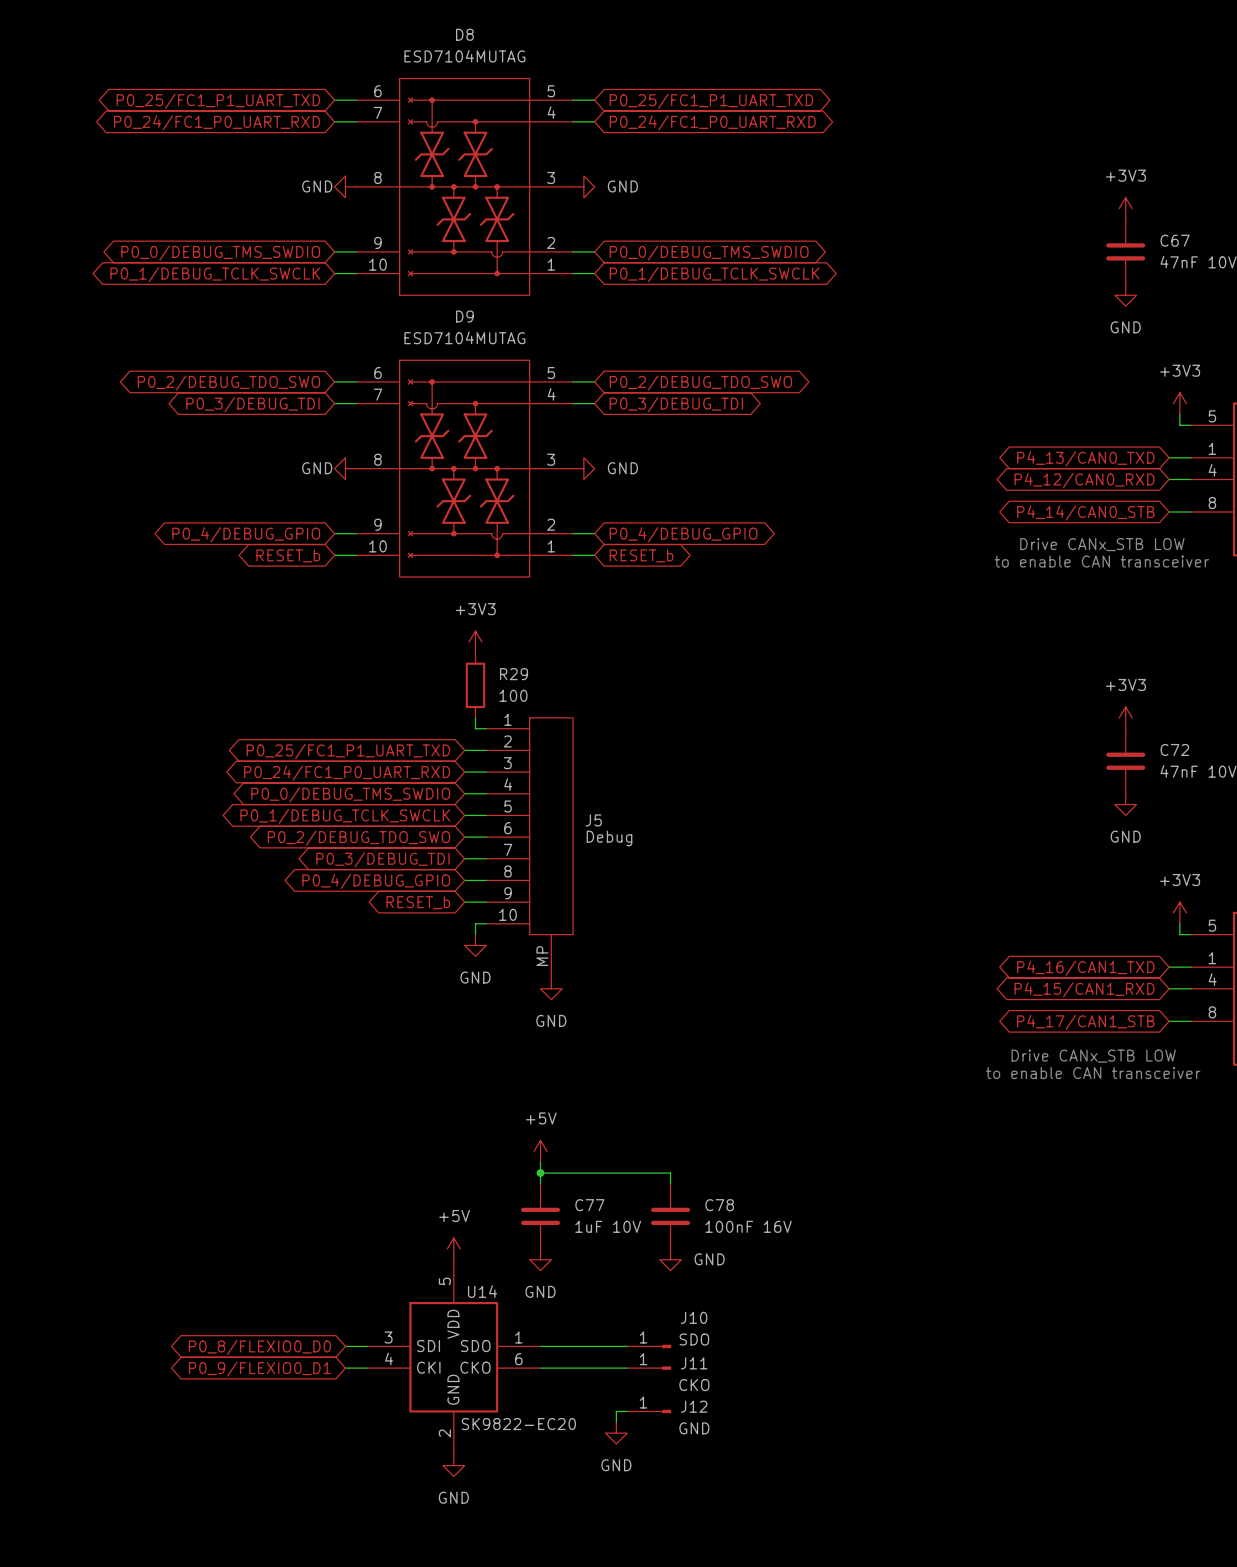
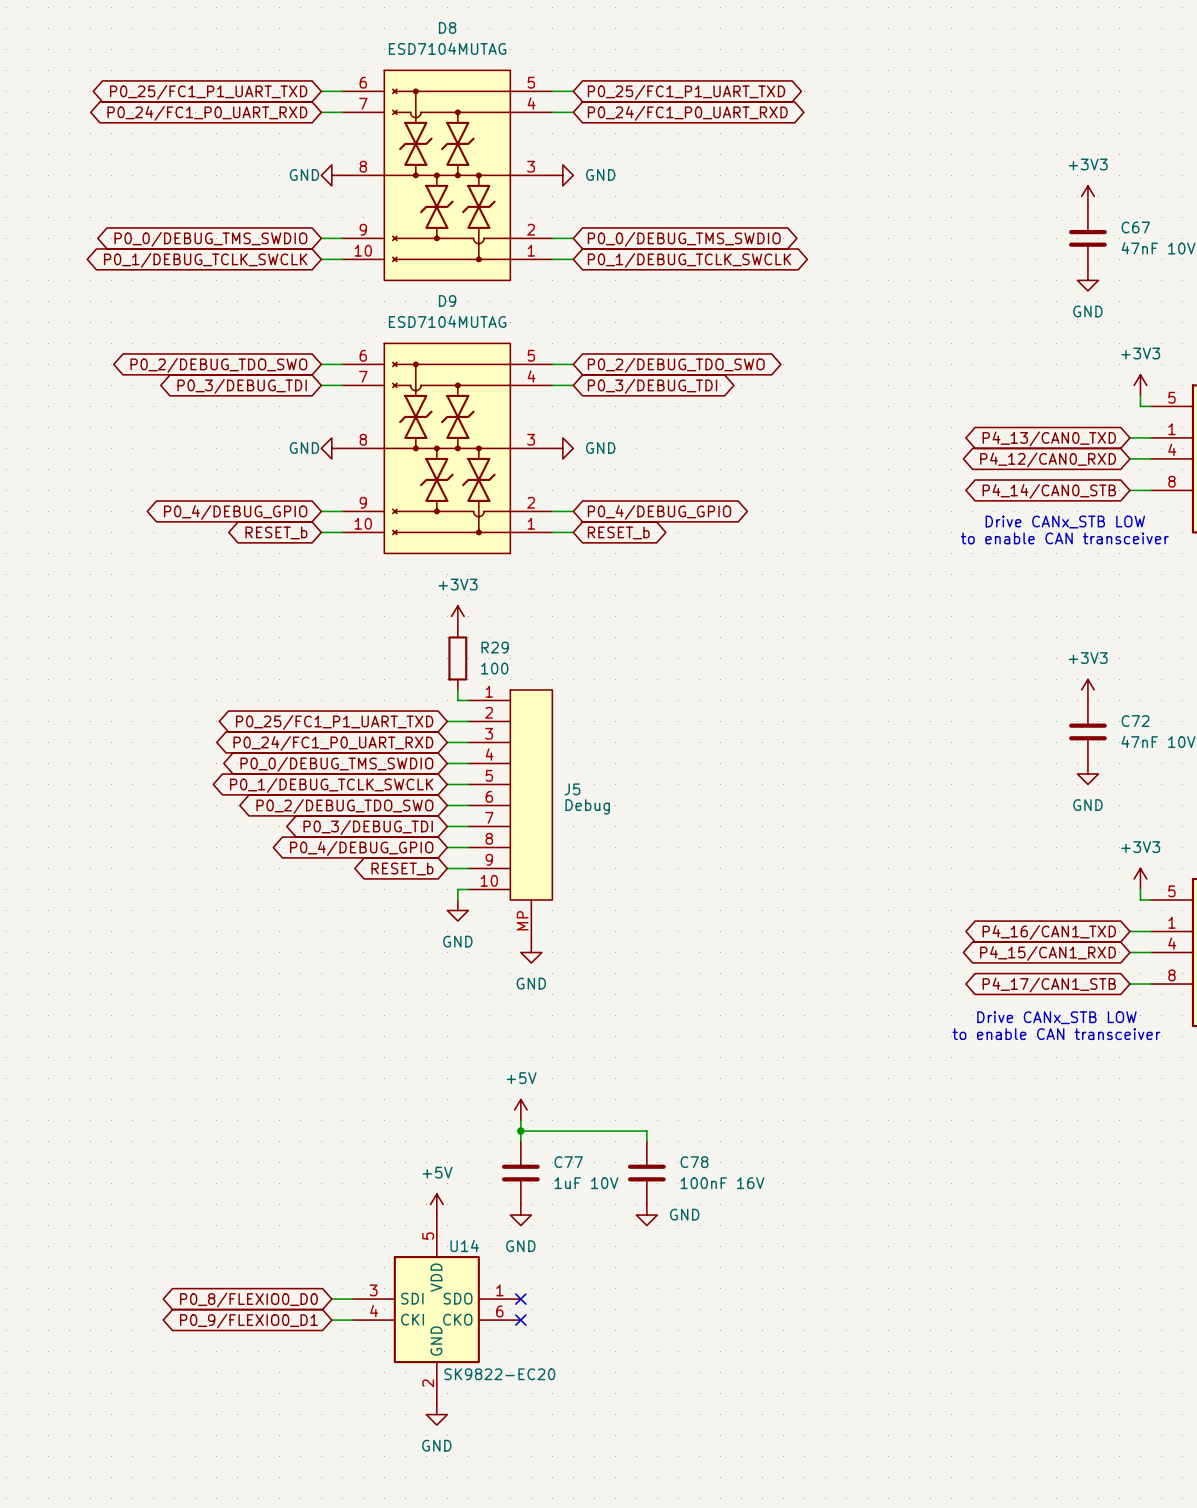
wire: (540, 1346) (627, 1346) -> none
no-connect mark: none -> (520, 1299)
J10: SDO (649, 1346) -> none
wire: (540, 1368) (627, 1368) -> none
no-connect mark: none -> (520, 1320)
J11: CKO (649, 1368) -> none
wire: (627, 1411) (616, 1411) (616, 1422) -> none
J12: GND (649, 1411) -> none
power symbol: GND (616, 1433) -> none

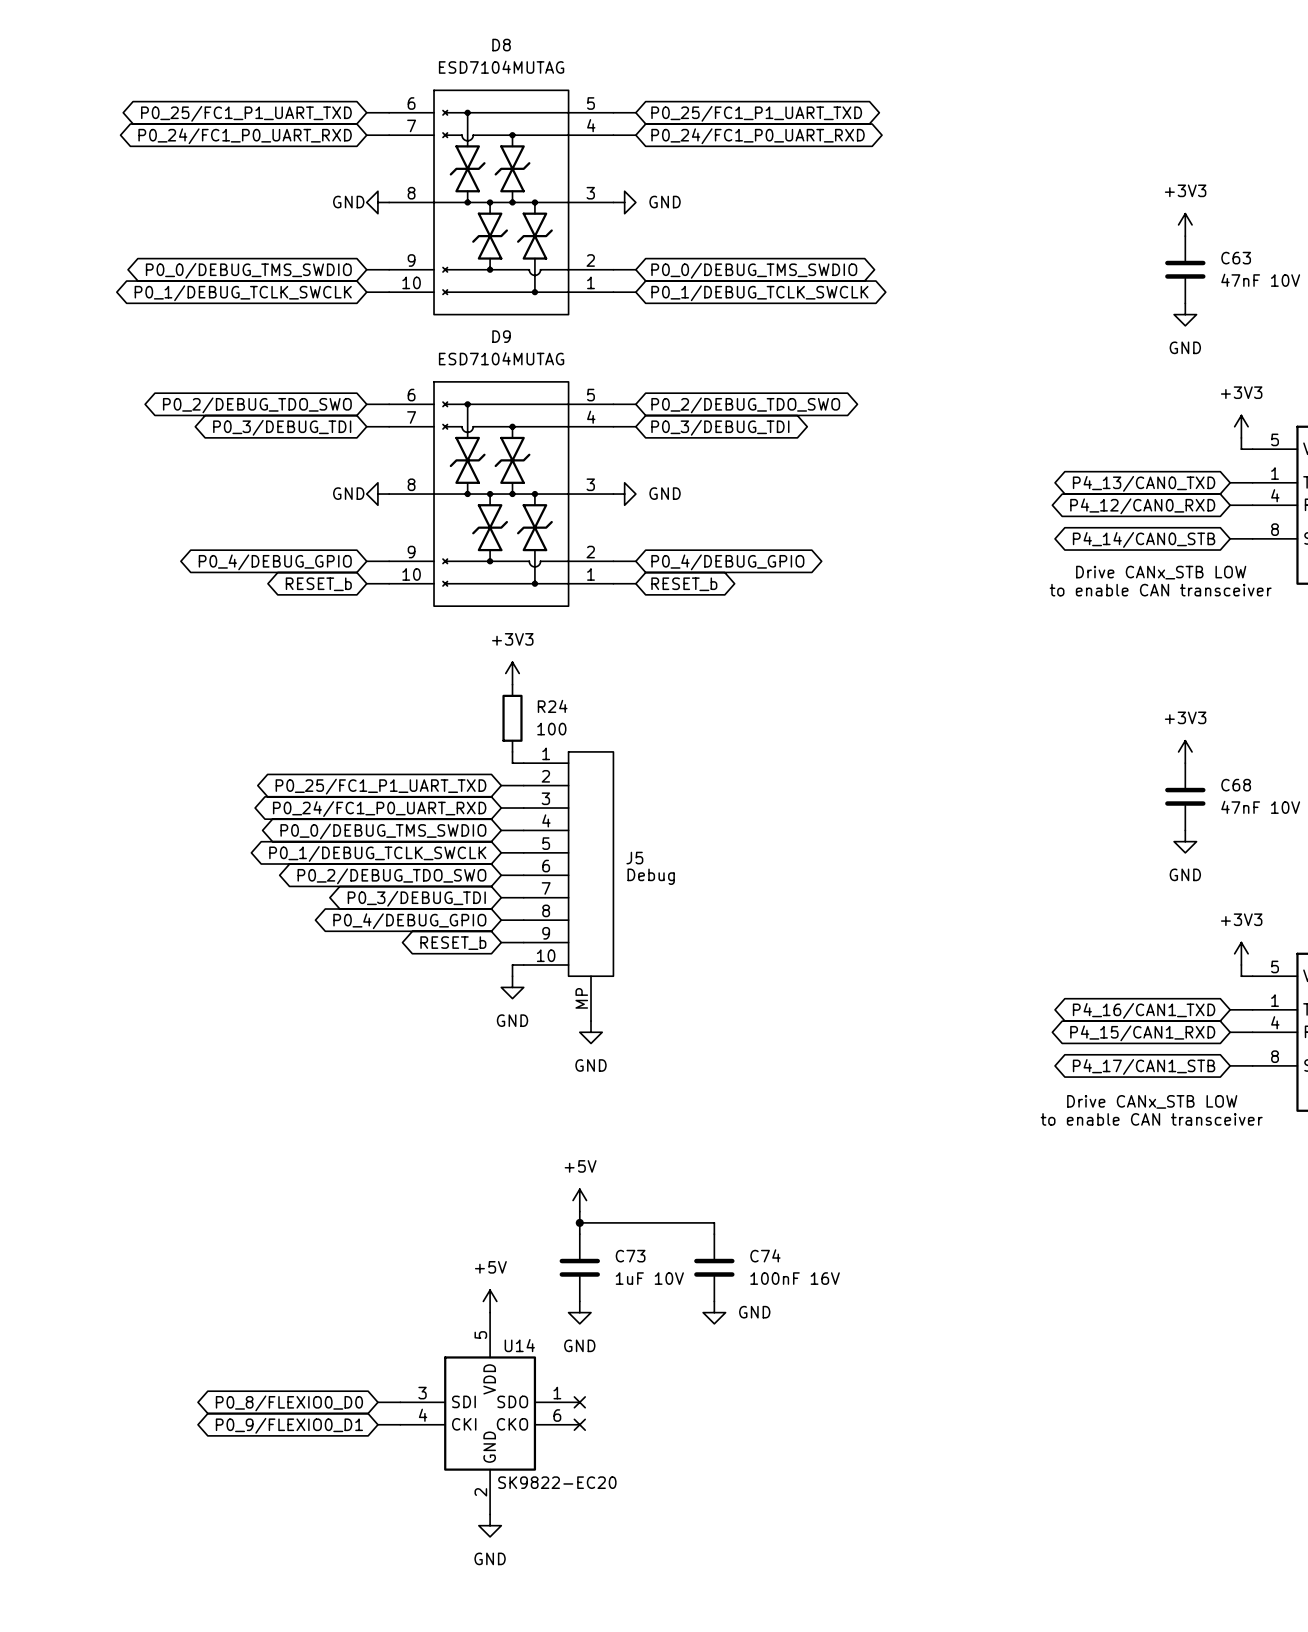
C67 name: C67 (1135, 227) -> C63 (1236, 258)
R29 name: R29 (495, 647) -> R24 (552, 706)
C72 name: C72 (1135, 721) -> C68 (1236, 785)
C77 name: C77 (568, 1162) -> C73 (630, 1256)
C78 name: C78 (694, 1162) -> C74 (765, 1255)

